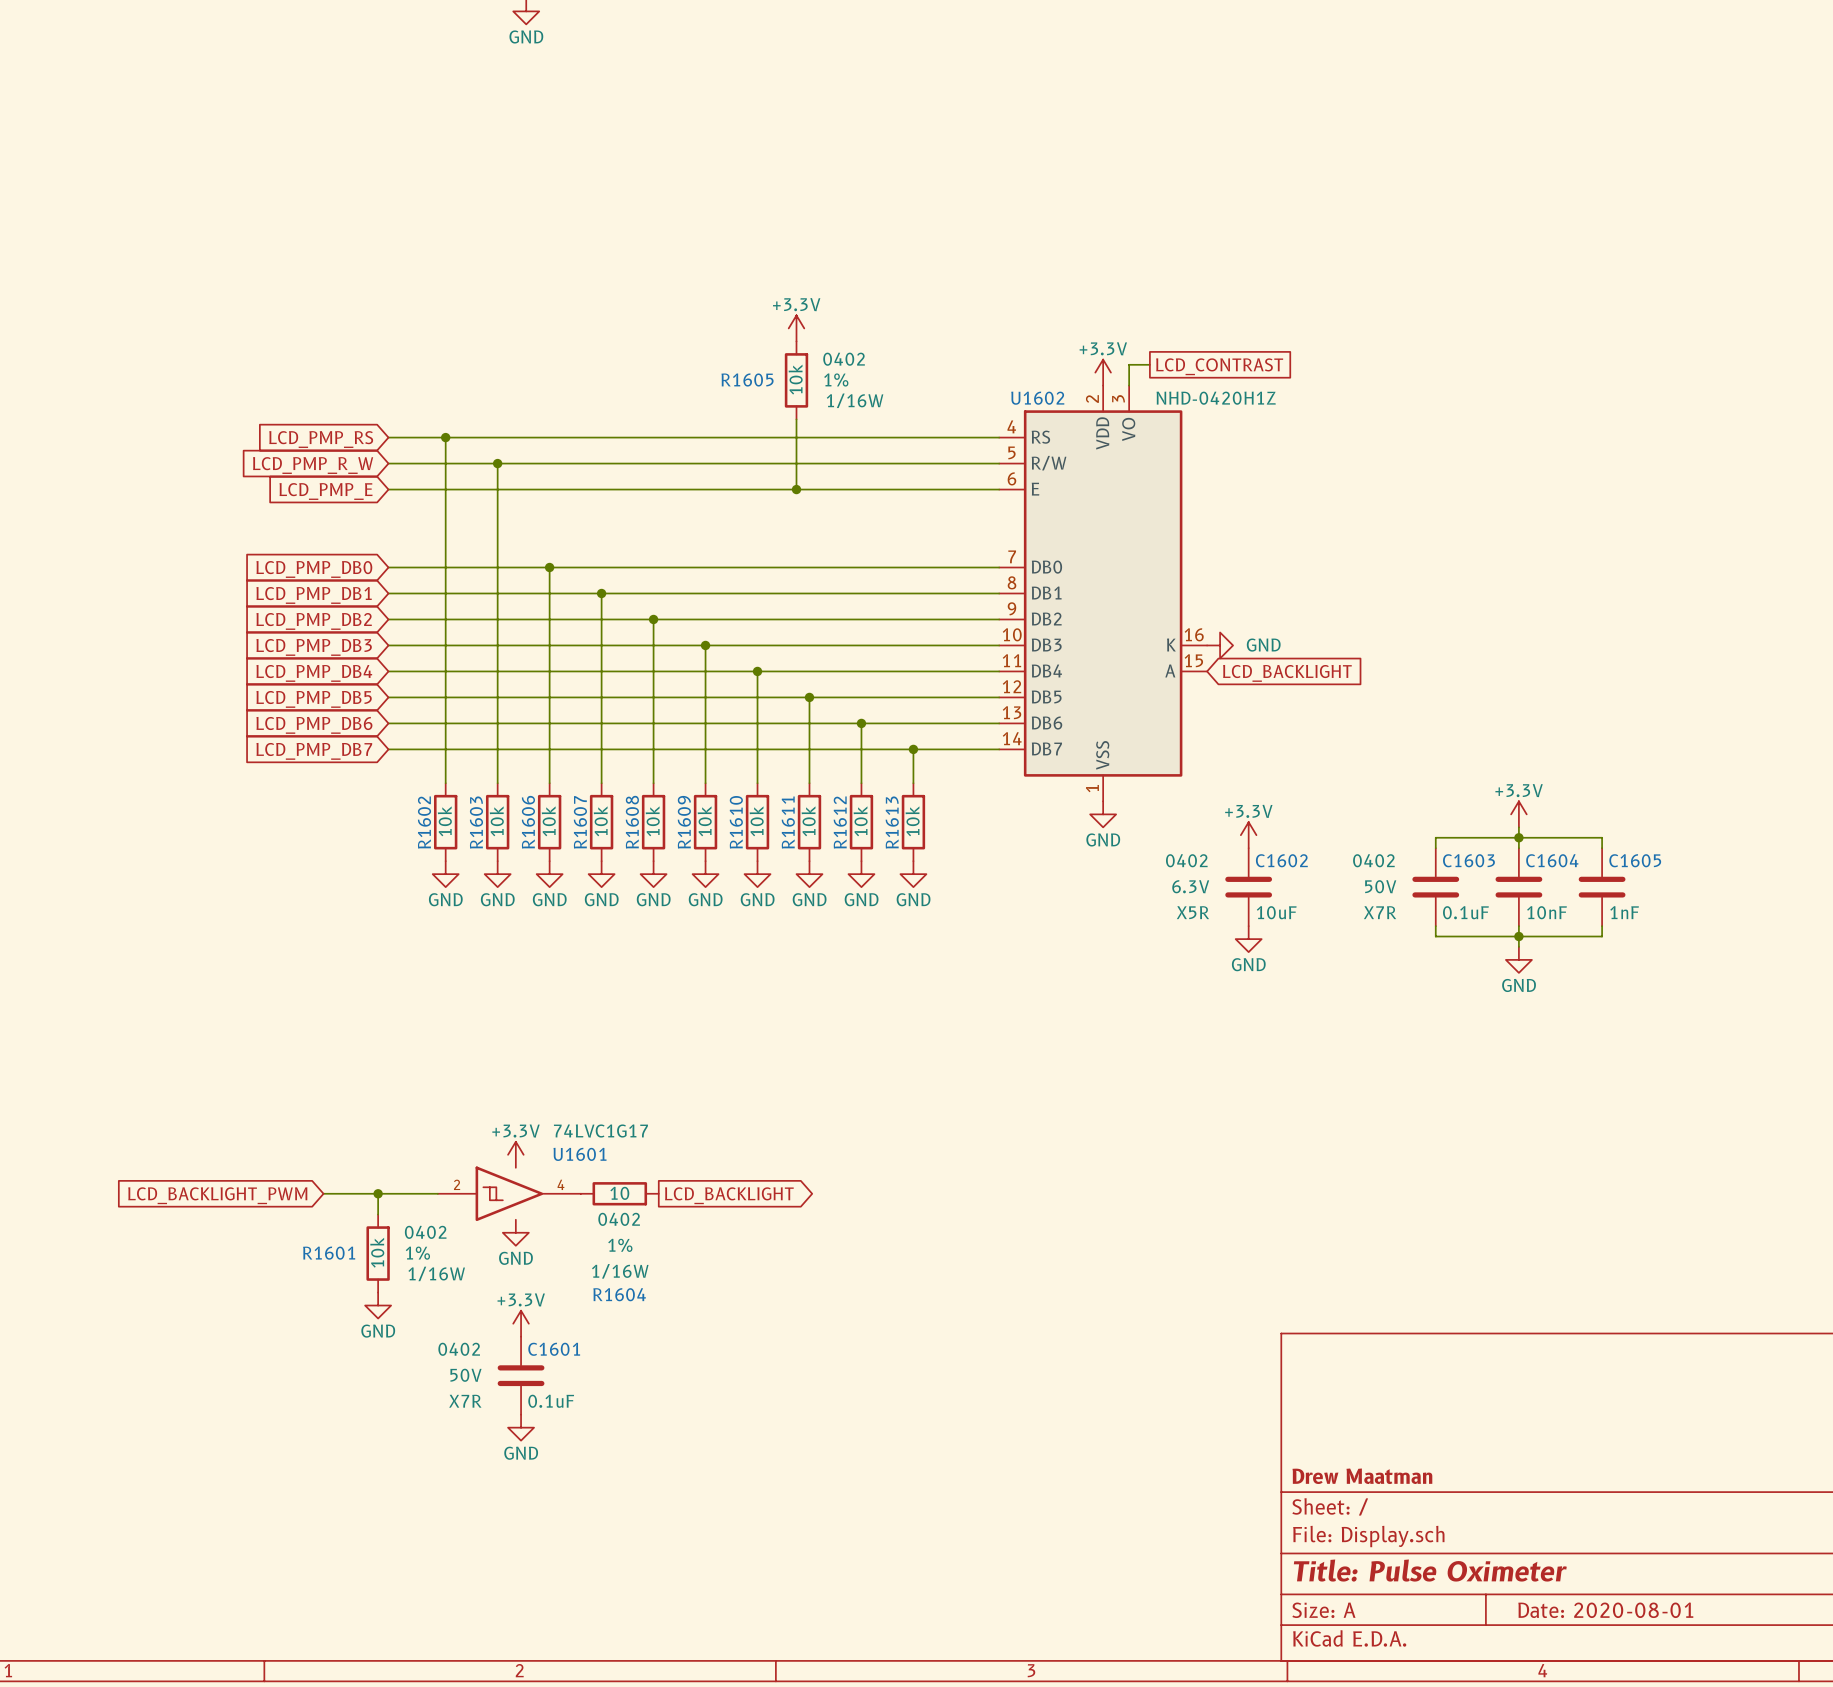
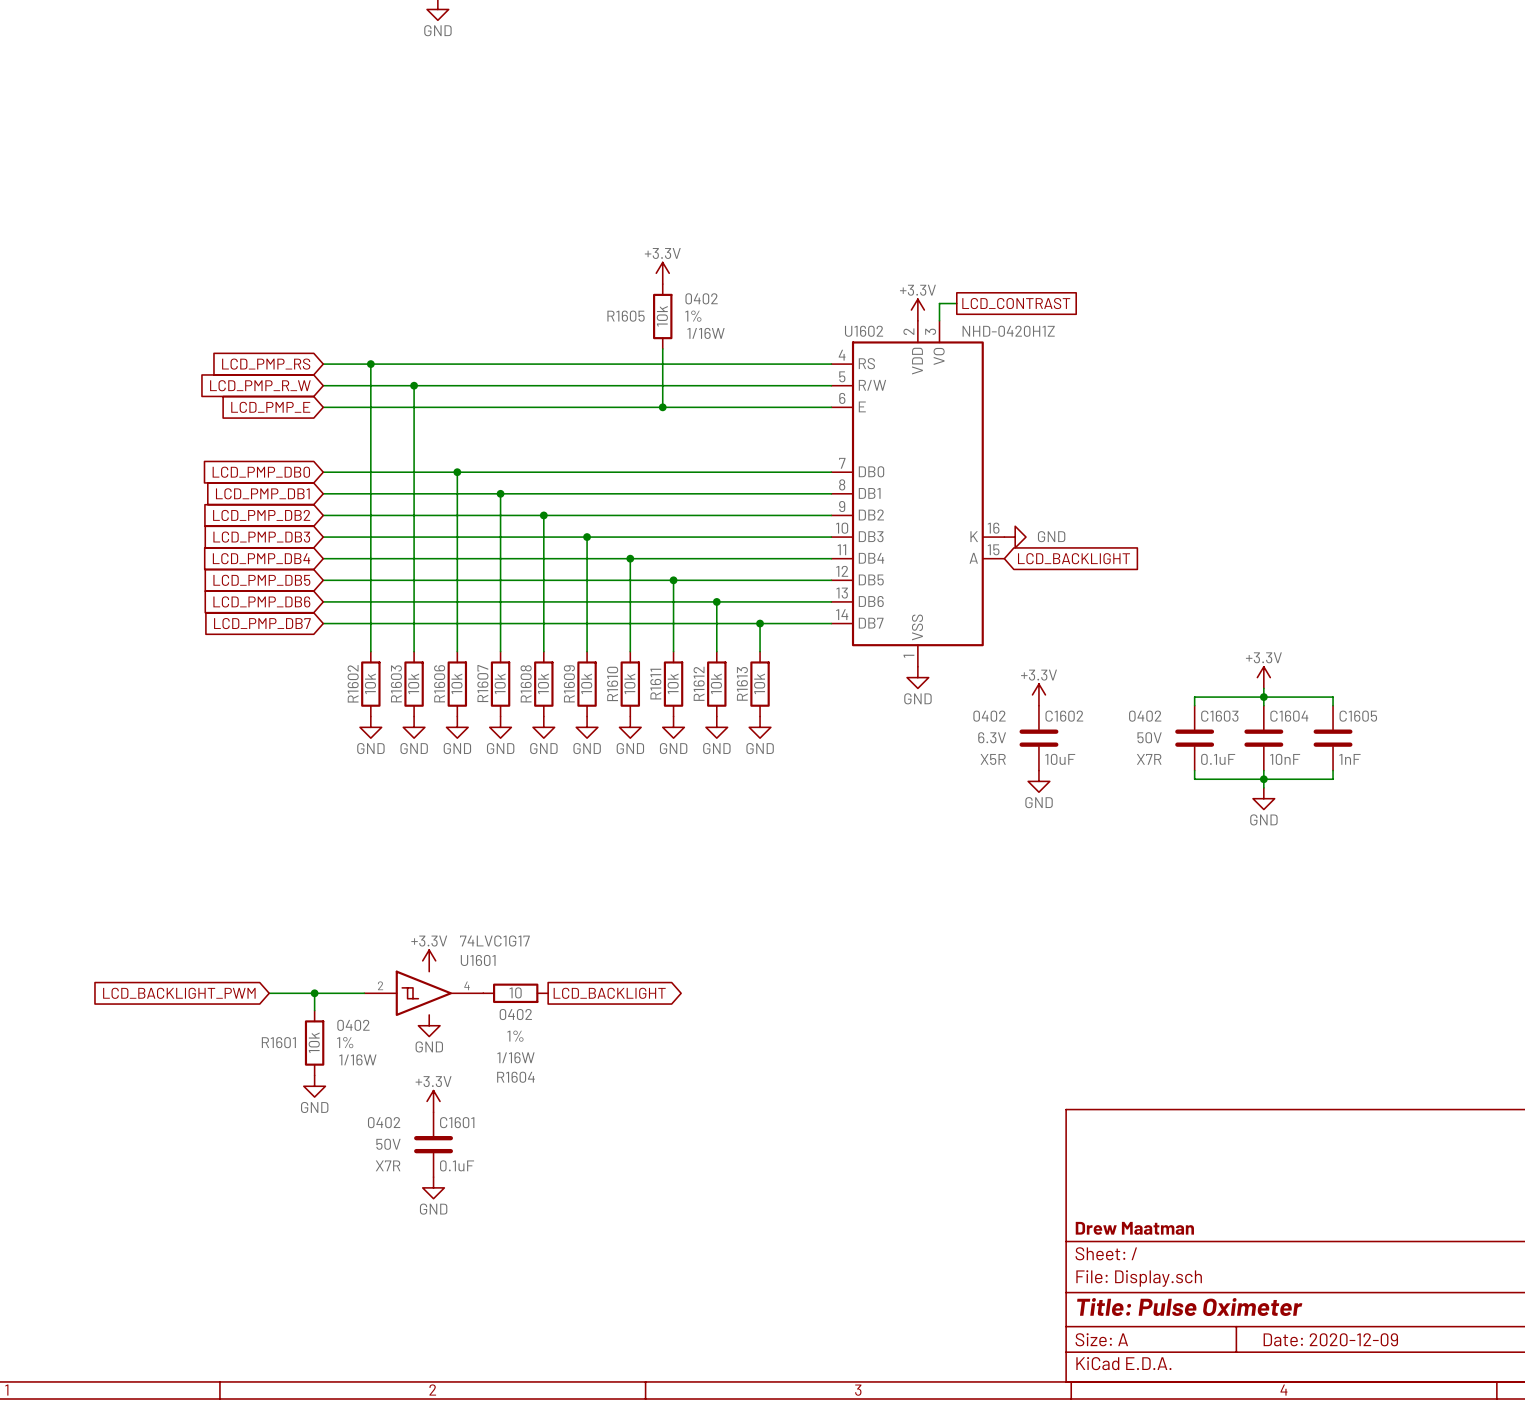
title block: Date: 2020-08-01 (1605, 1610) -> Date: 2020-12-09 (1330, 1339)

